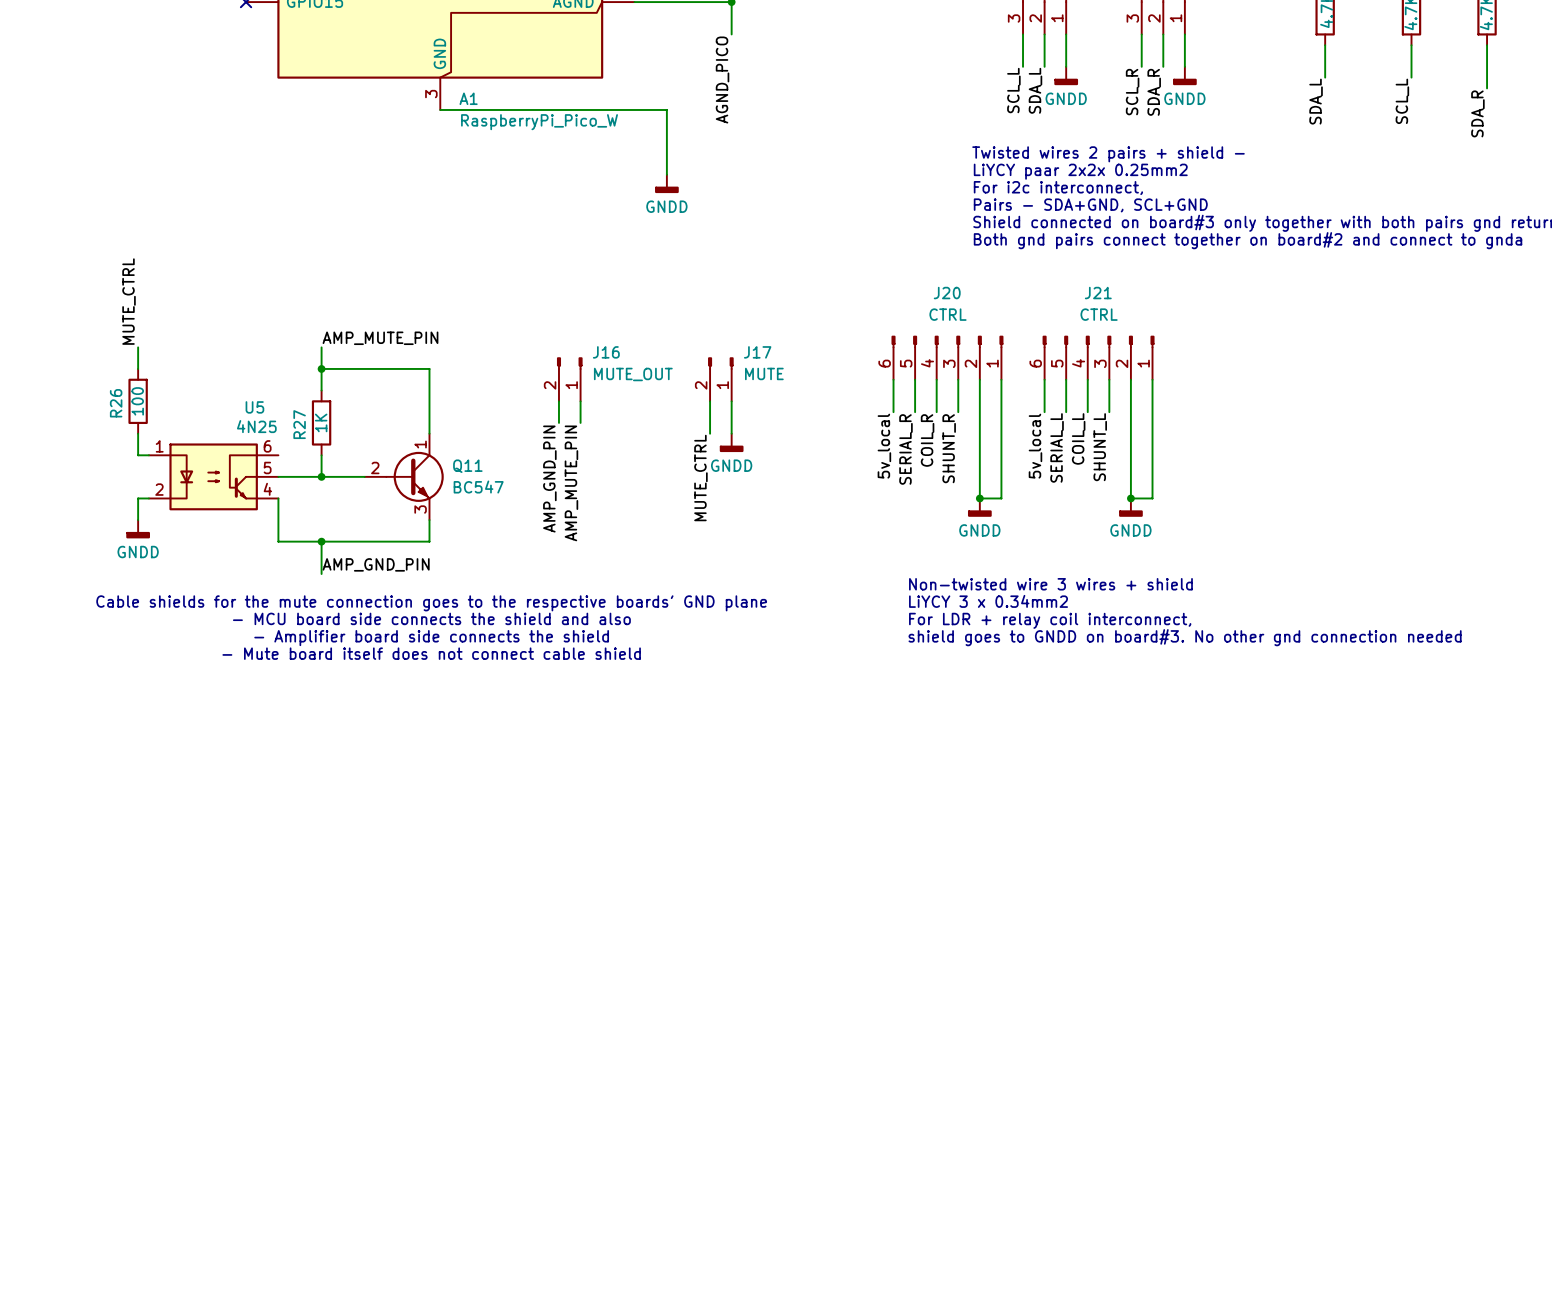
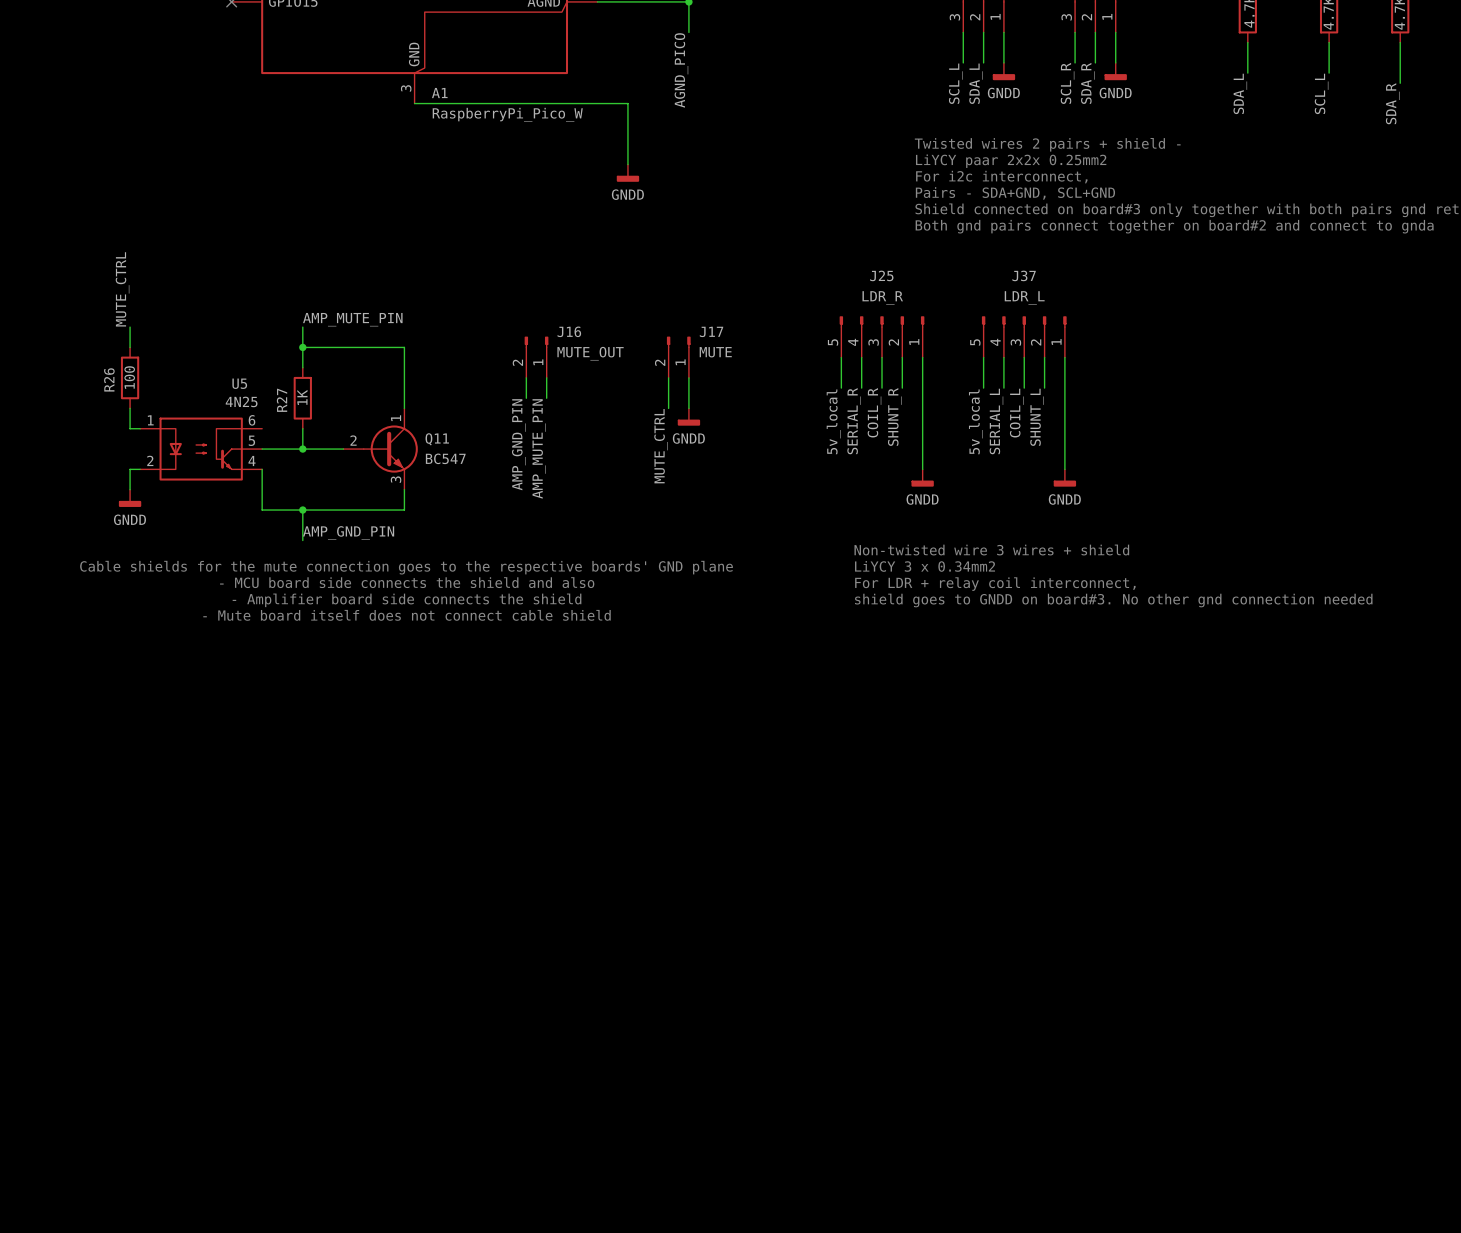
J25: none -> LDR_R (882, 336)
J20: CTRL (947, 357) -> none
J37: none -> LDR_L (1024, 336)
J21: CTRL (1098, 357) -> none
wire: (1001, 379) (1001, 498) (979, 498) -> none
wire: (1152, 379) (1152, 498) (1130, 498) -> none
junction: (979, 498) -> none
junction: (1130, 498) -> none

